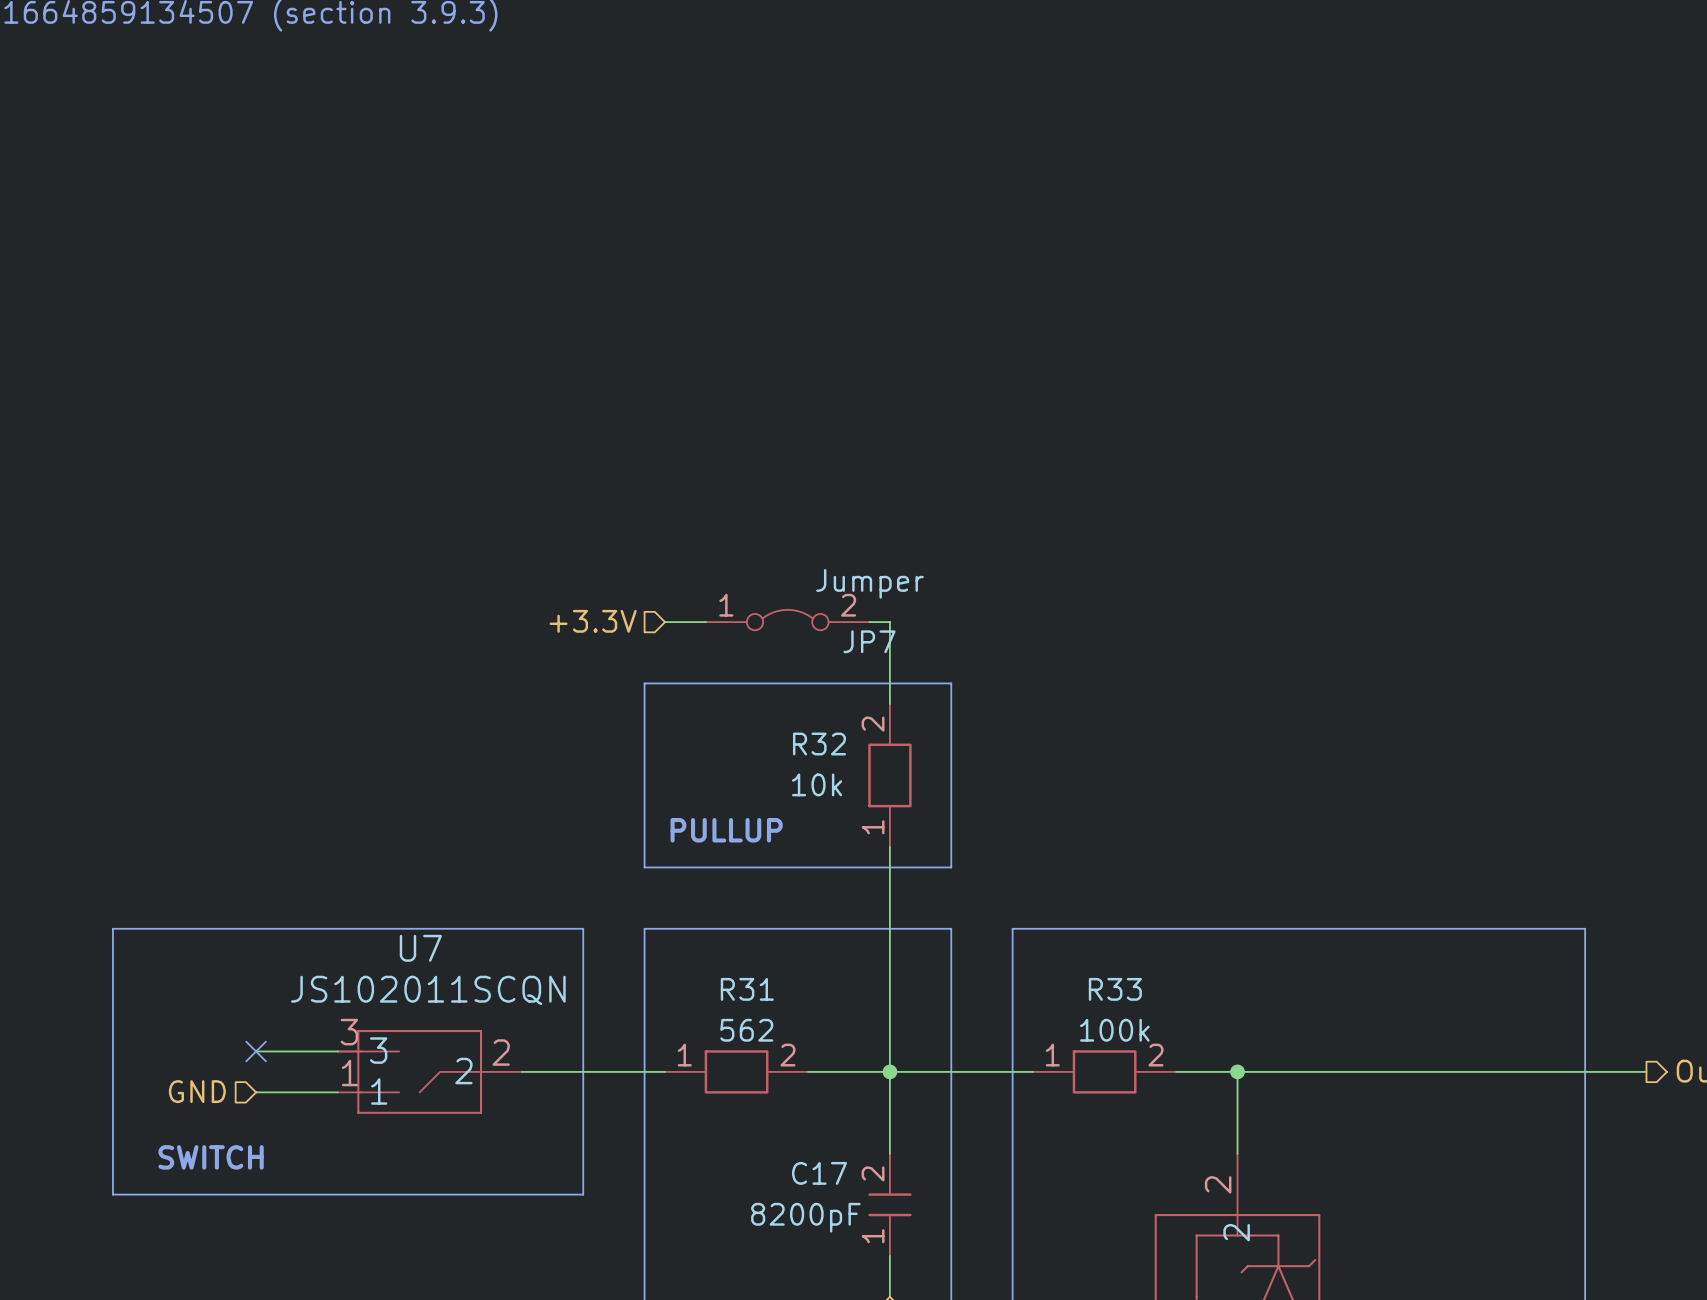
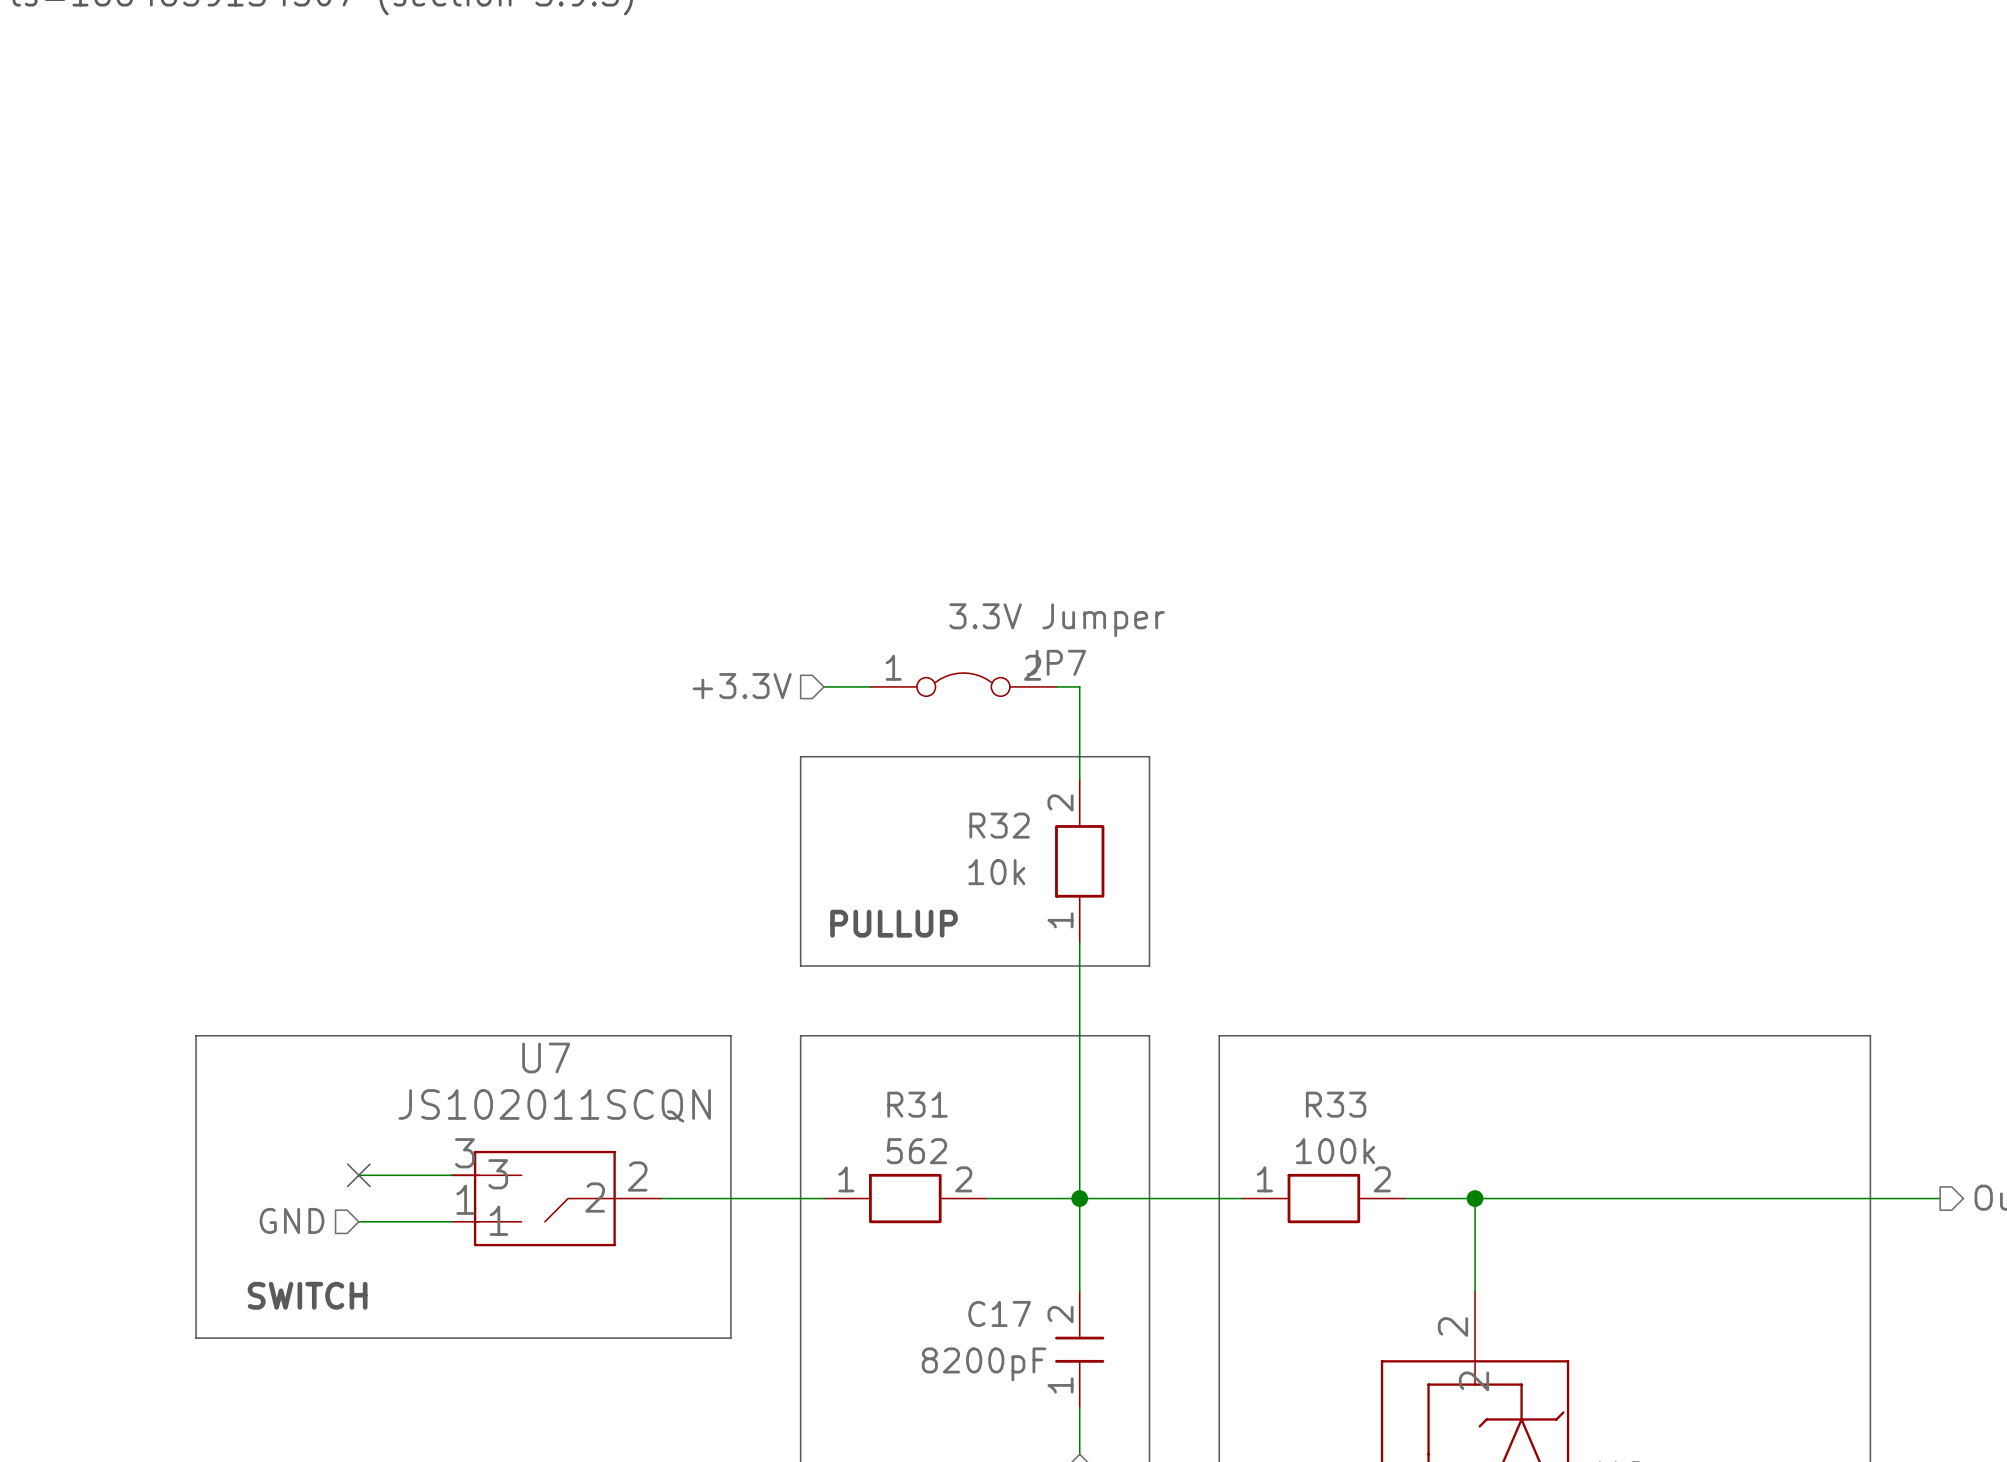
JP7 value: Jumper (869, 583) -> 3.3V Jumper (1057, 620)
JP7 name position: JP7 (869, 641) -> JP7 (1056, 662)

